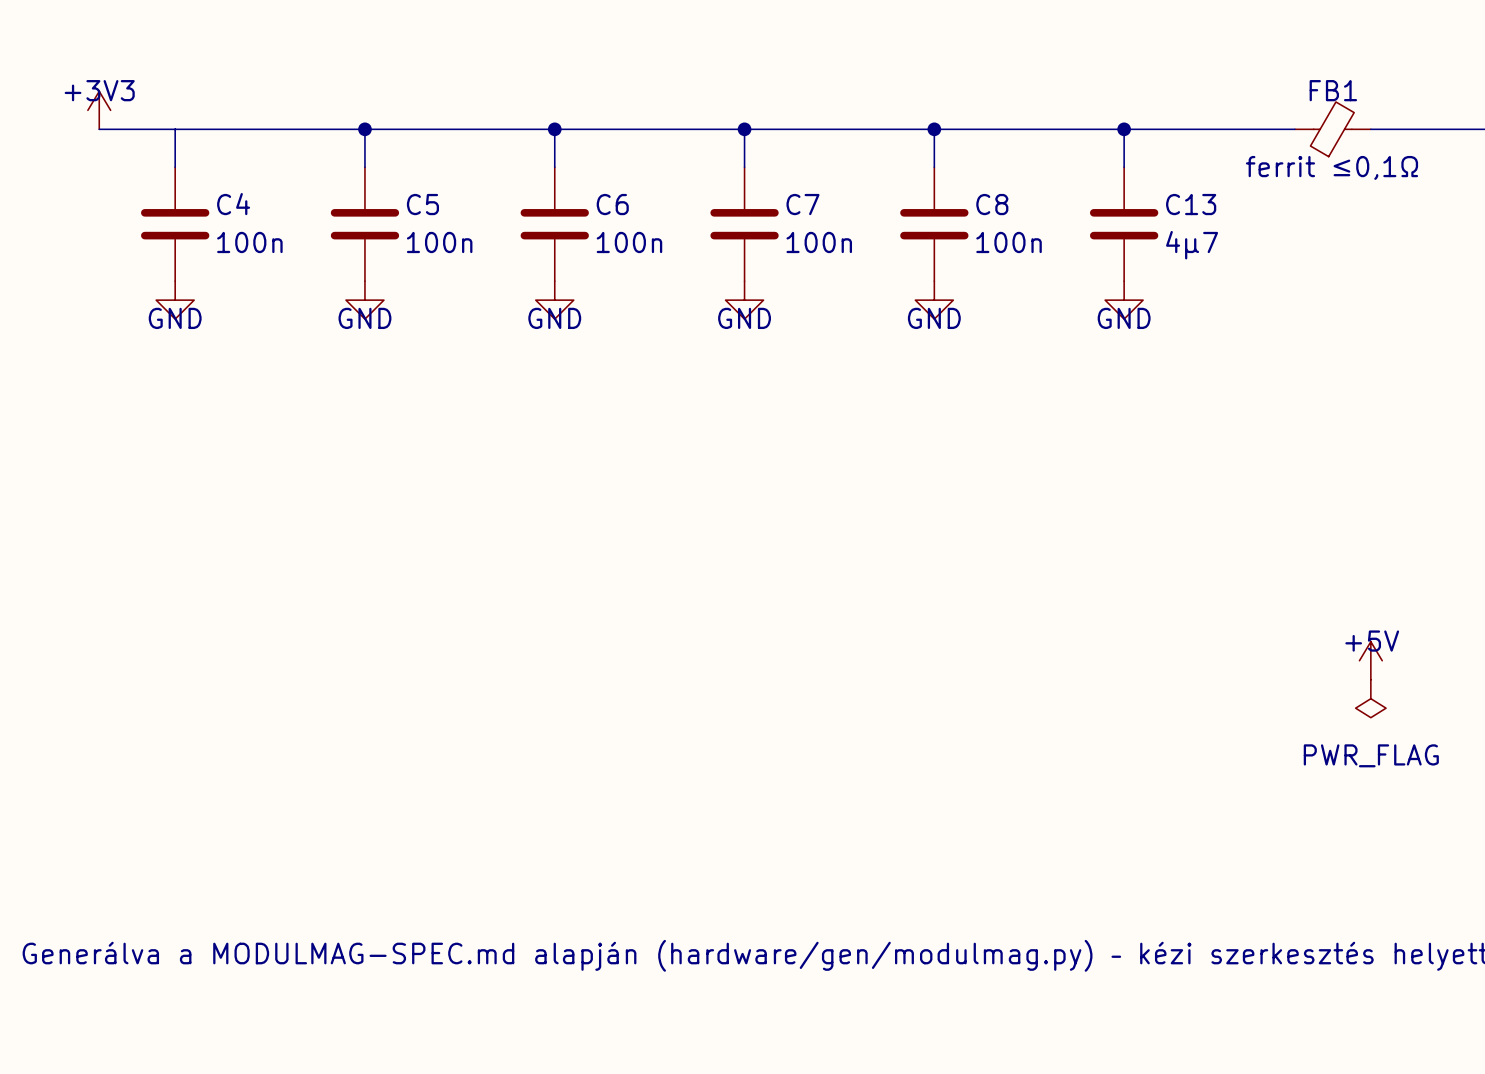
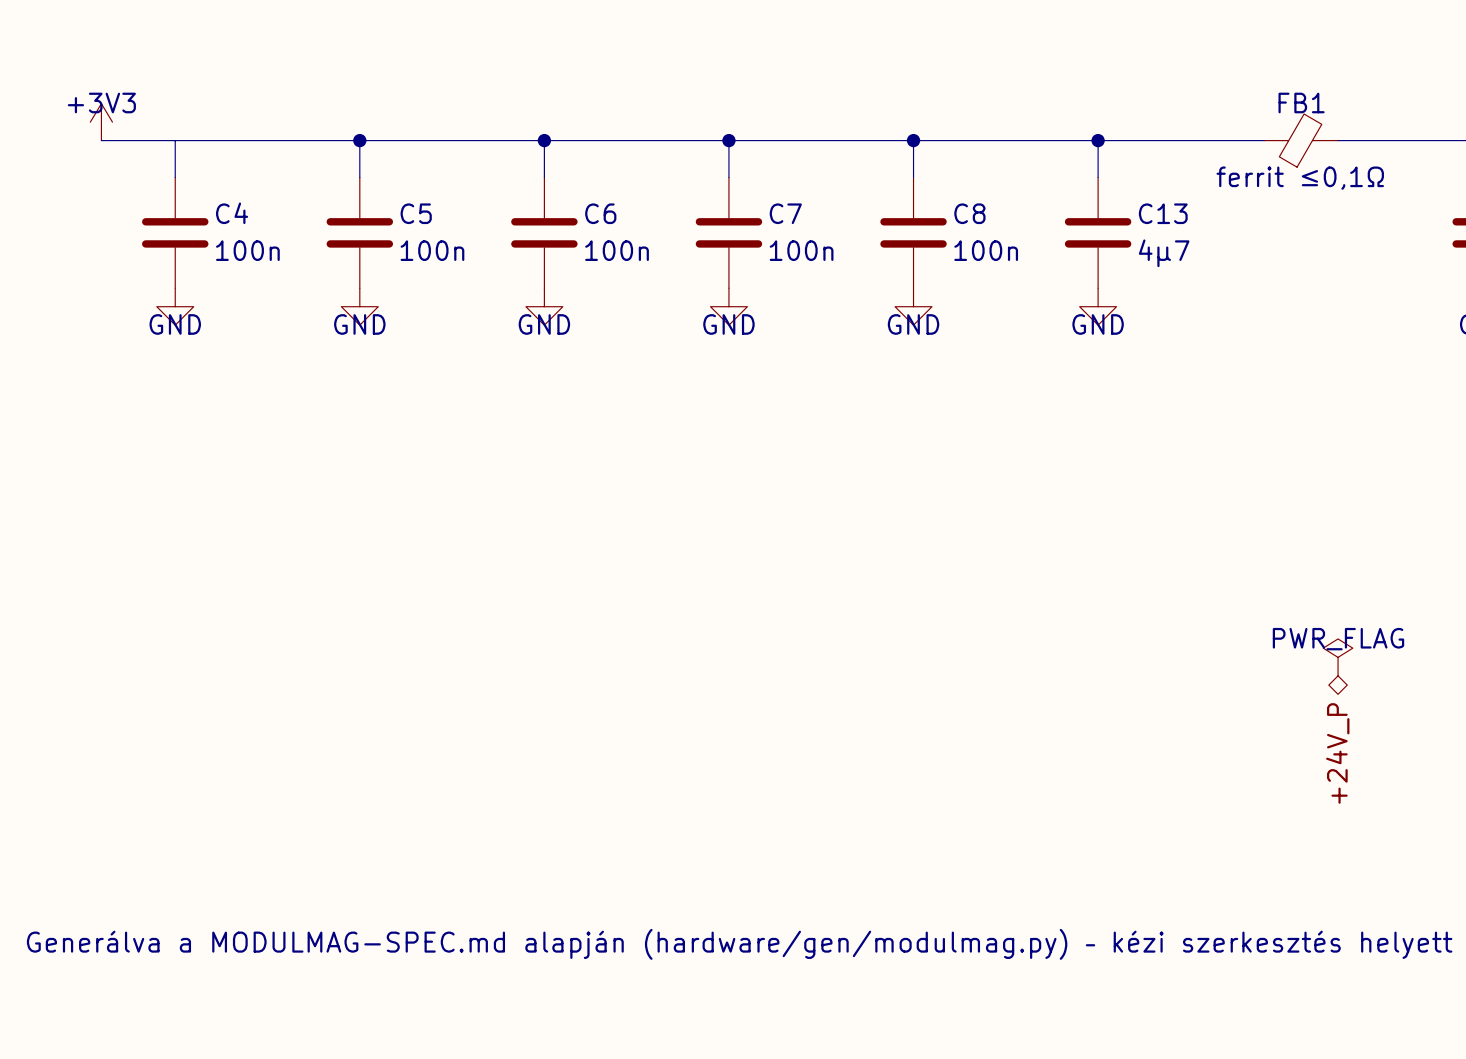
power symbol: +5V (1370, 660) -> PWR_FLAG (1338, 657)
power symbol: PWR_FLAG (1370, 698) -> none
hierarchical label: none -> +24V_P (1337, 753)

